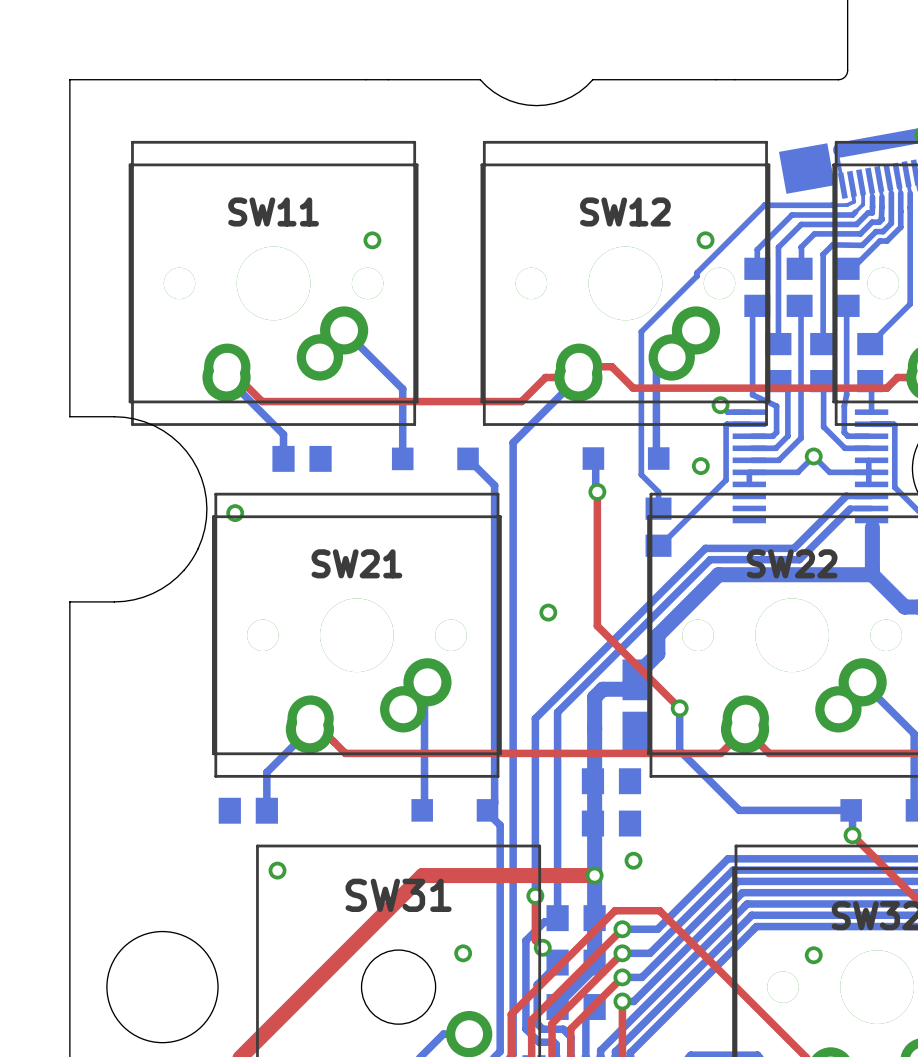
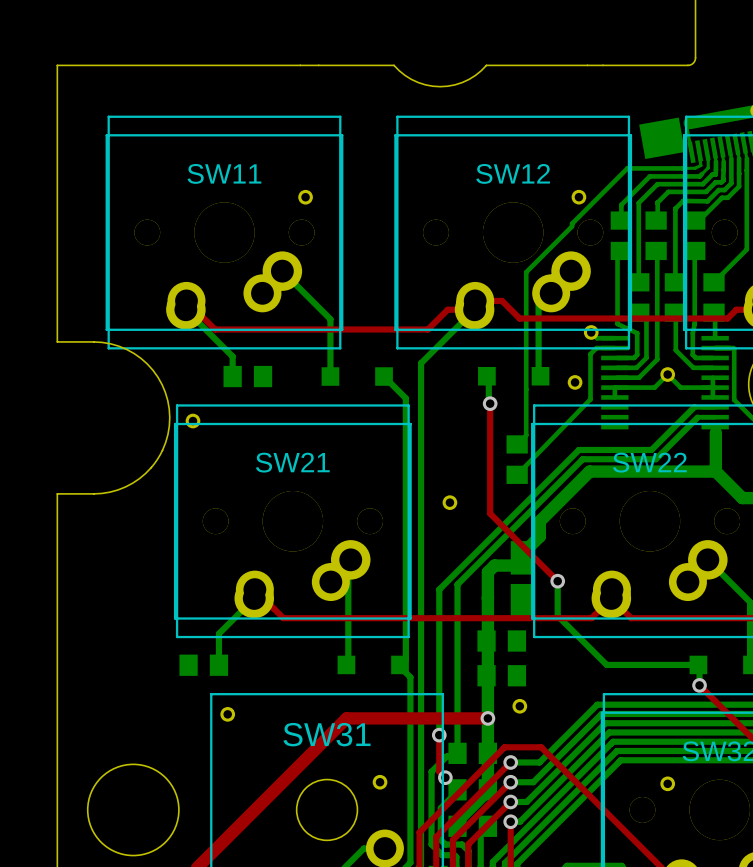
bottom track: (726, 425) (726, 480) (658, 545) -> (595, 348) (590, 354) (590, 399) (517, 474) (518, 474)
bottom track: (641, 474) (658, 491) (658, 508) -> (526, 389) (526, 435) (517, 444)
part position: (658, 527) -> (517, 459)

